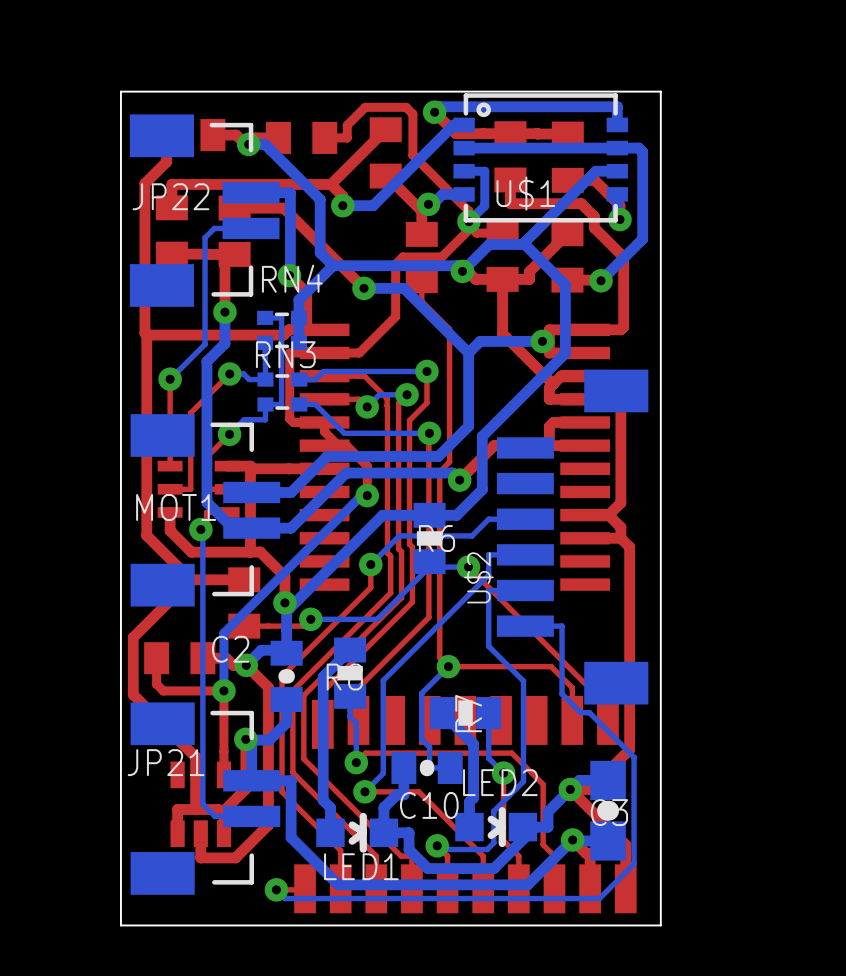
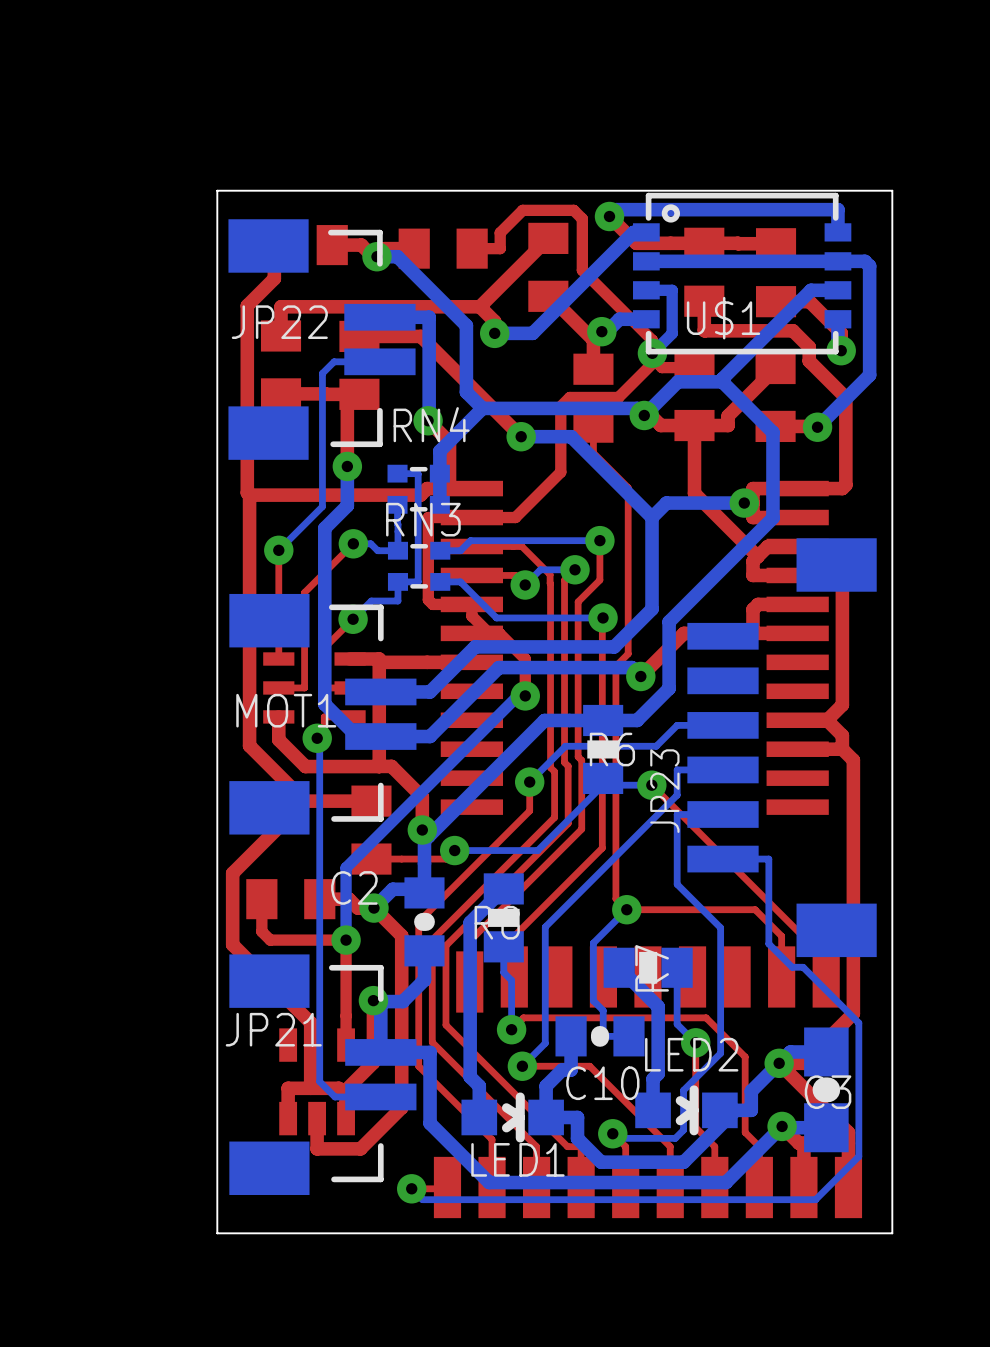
U$2 name: U$2 (478, 577) -> JP23 (664, 791)

